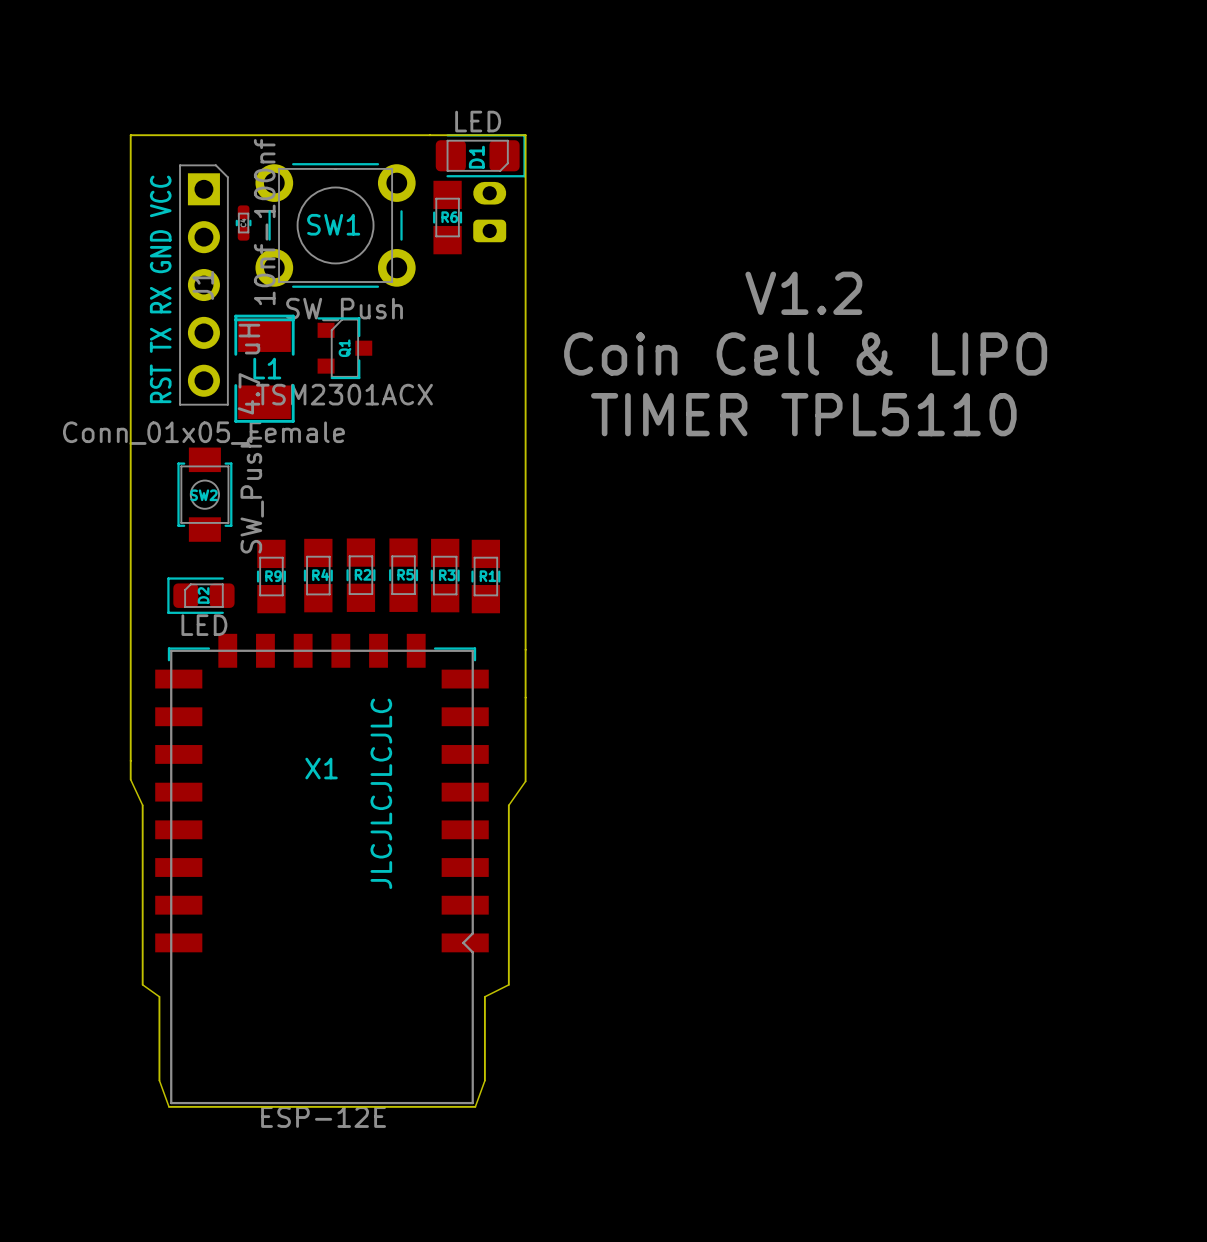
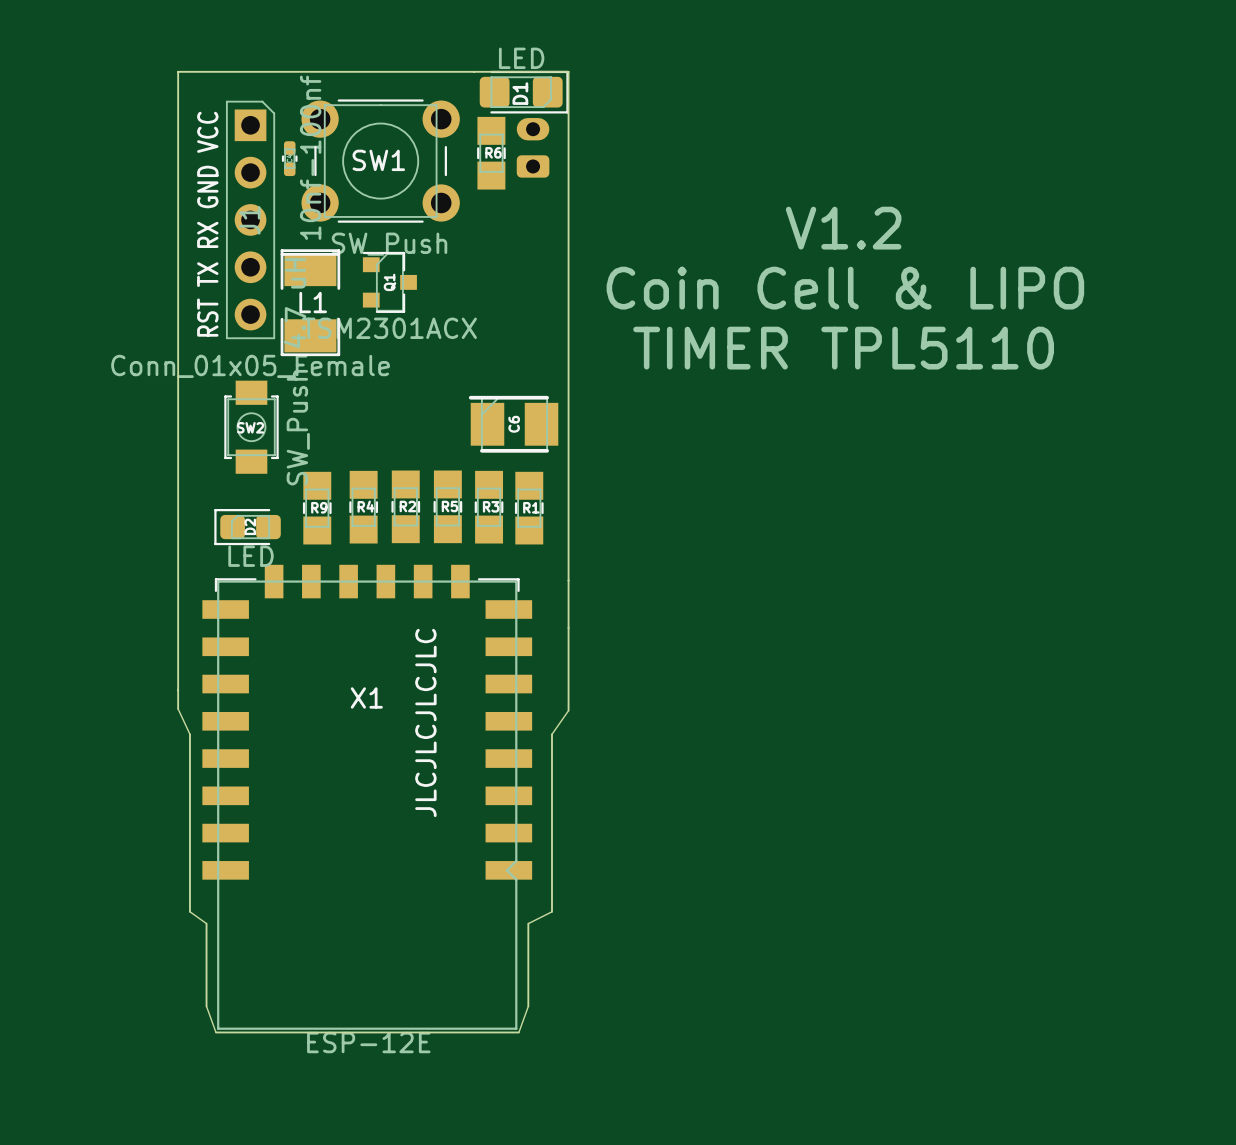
C6: none -> (513, 424)

